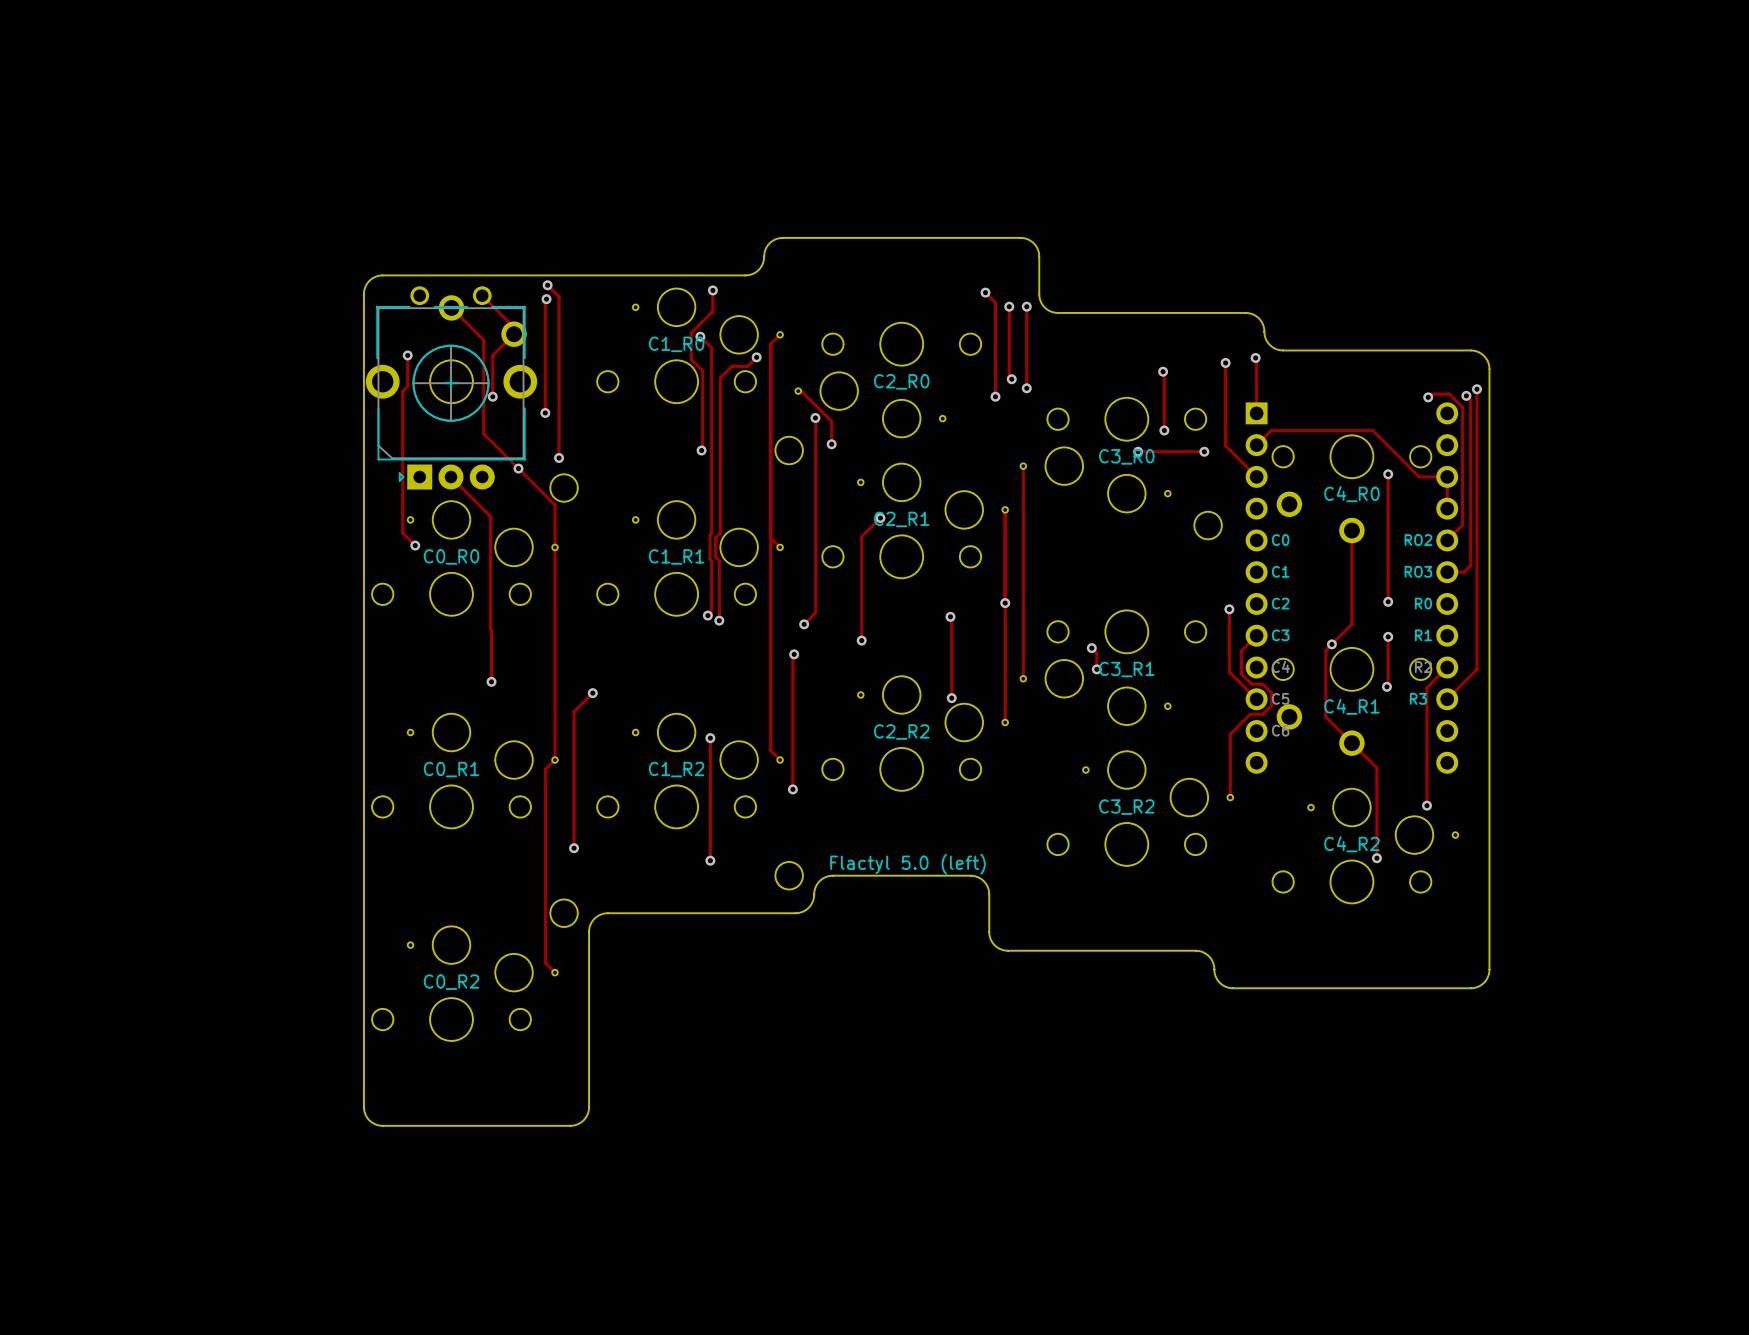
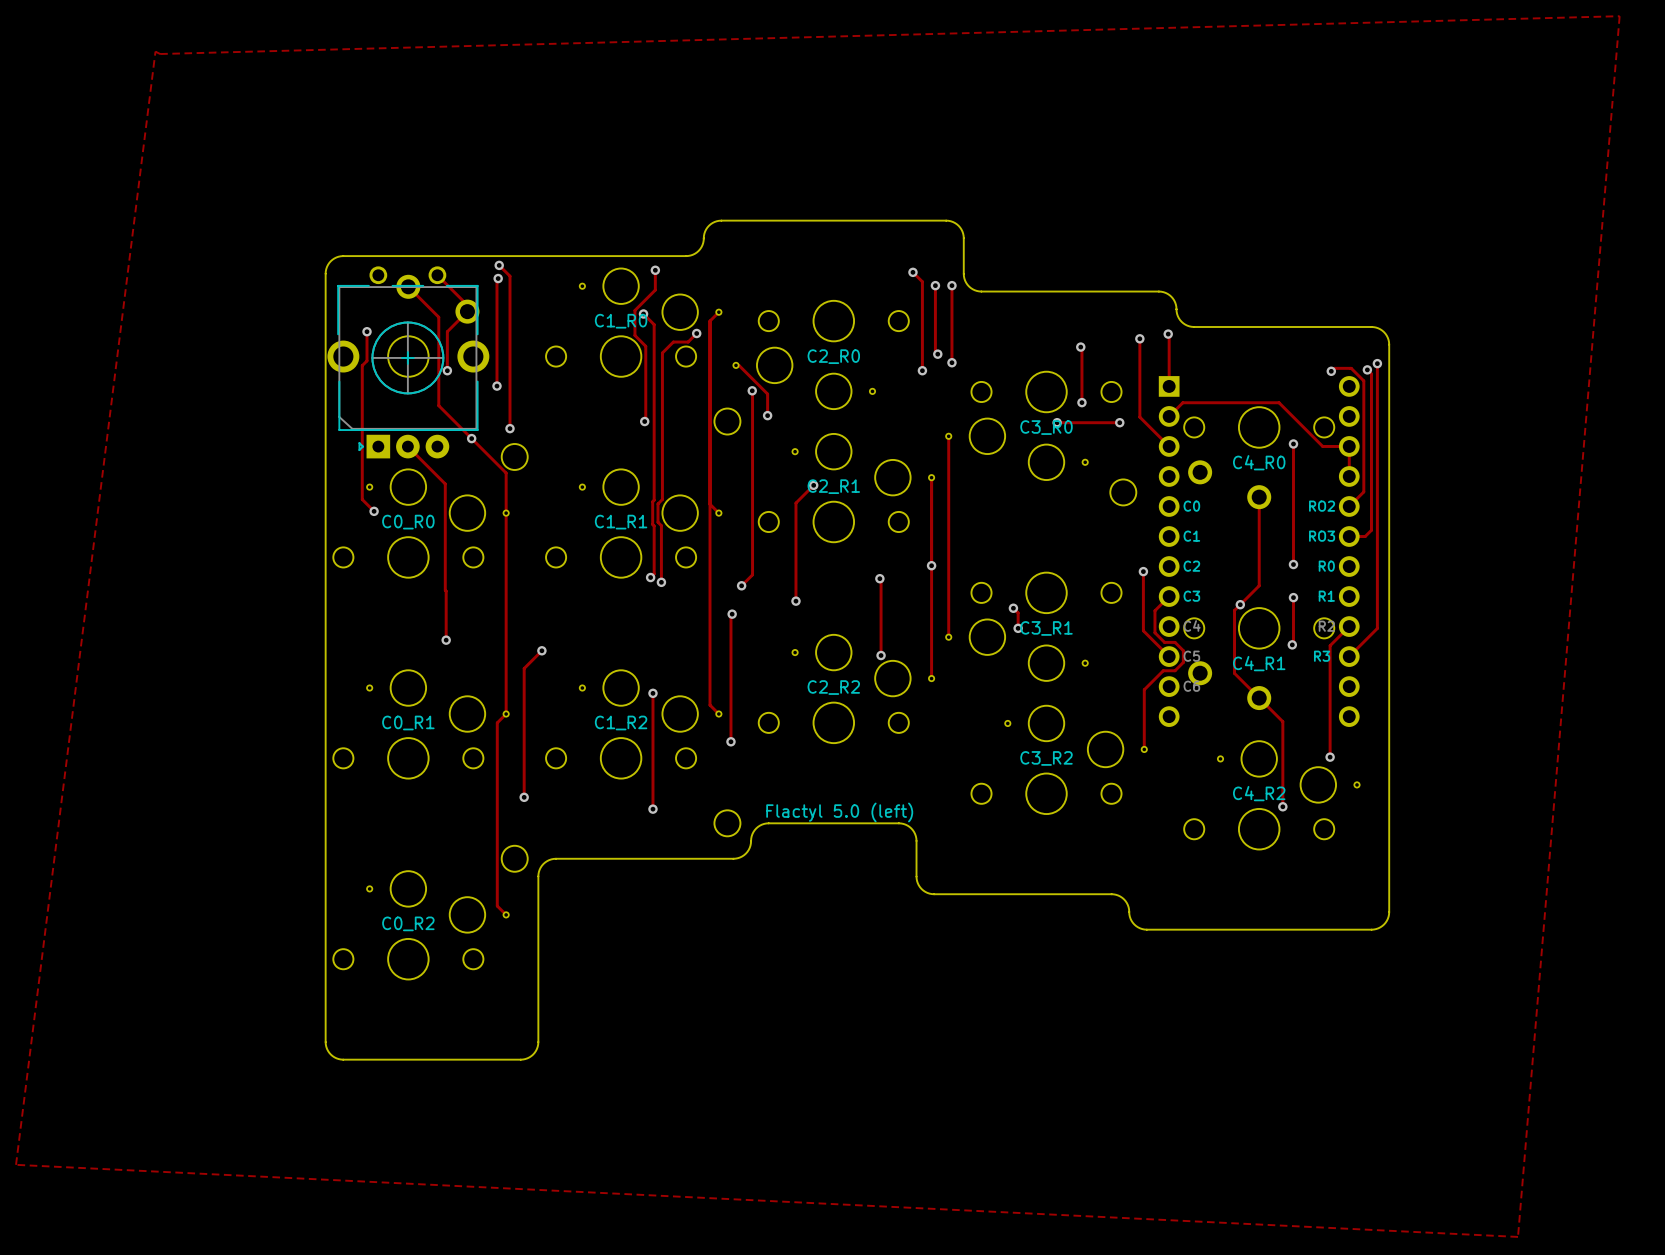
zone outline: none -> (1619, 16) (160, 54) (155, 51) (16, 1164) (1518, 1236) (1619, 16)

